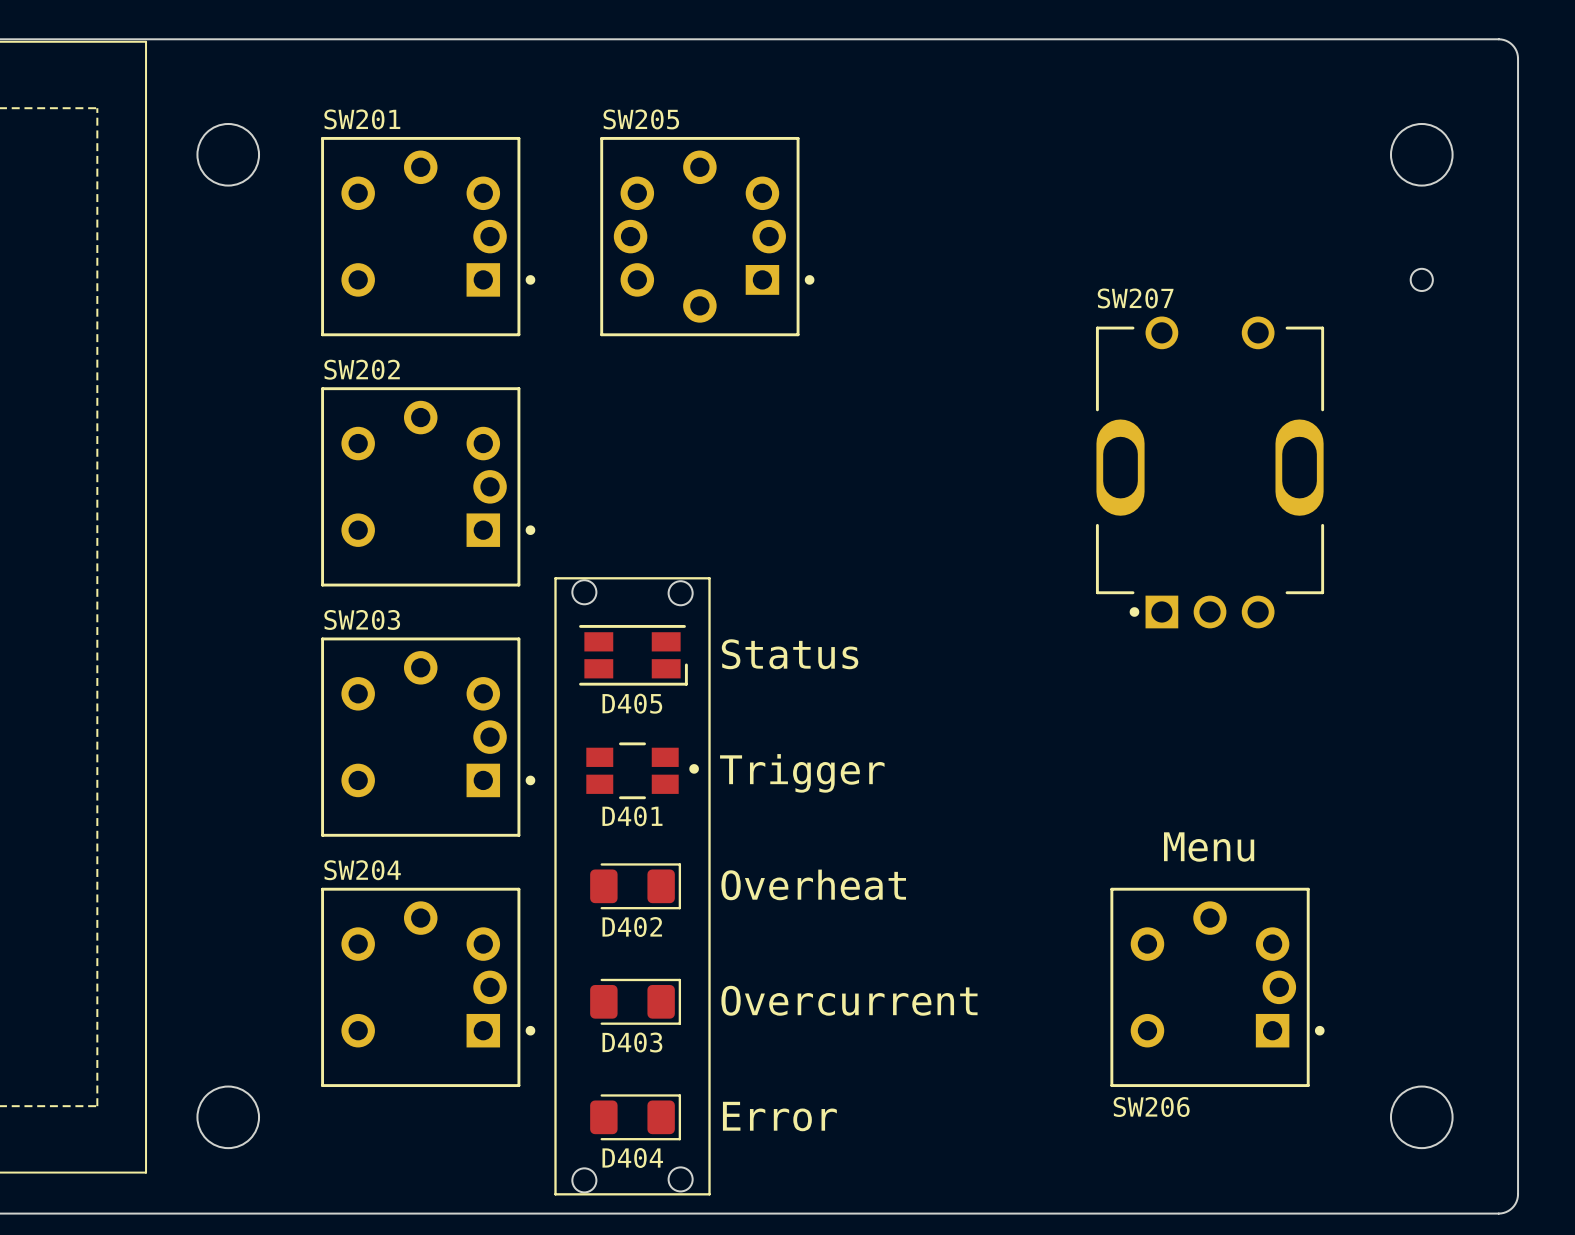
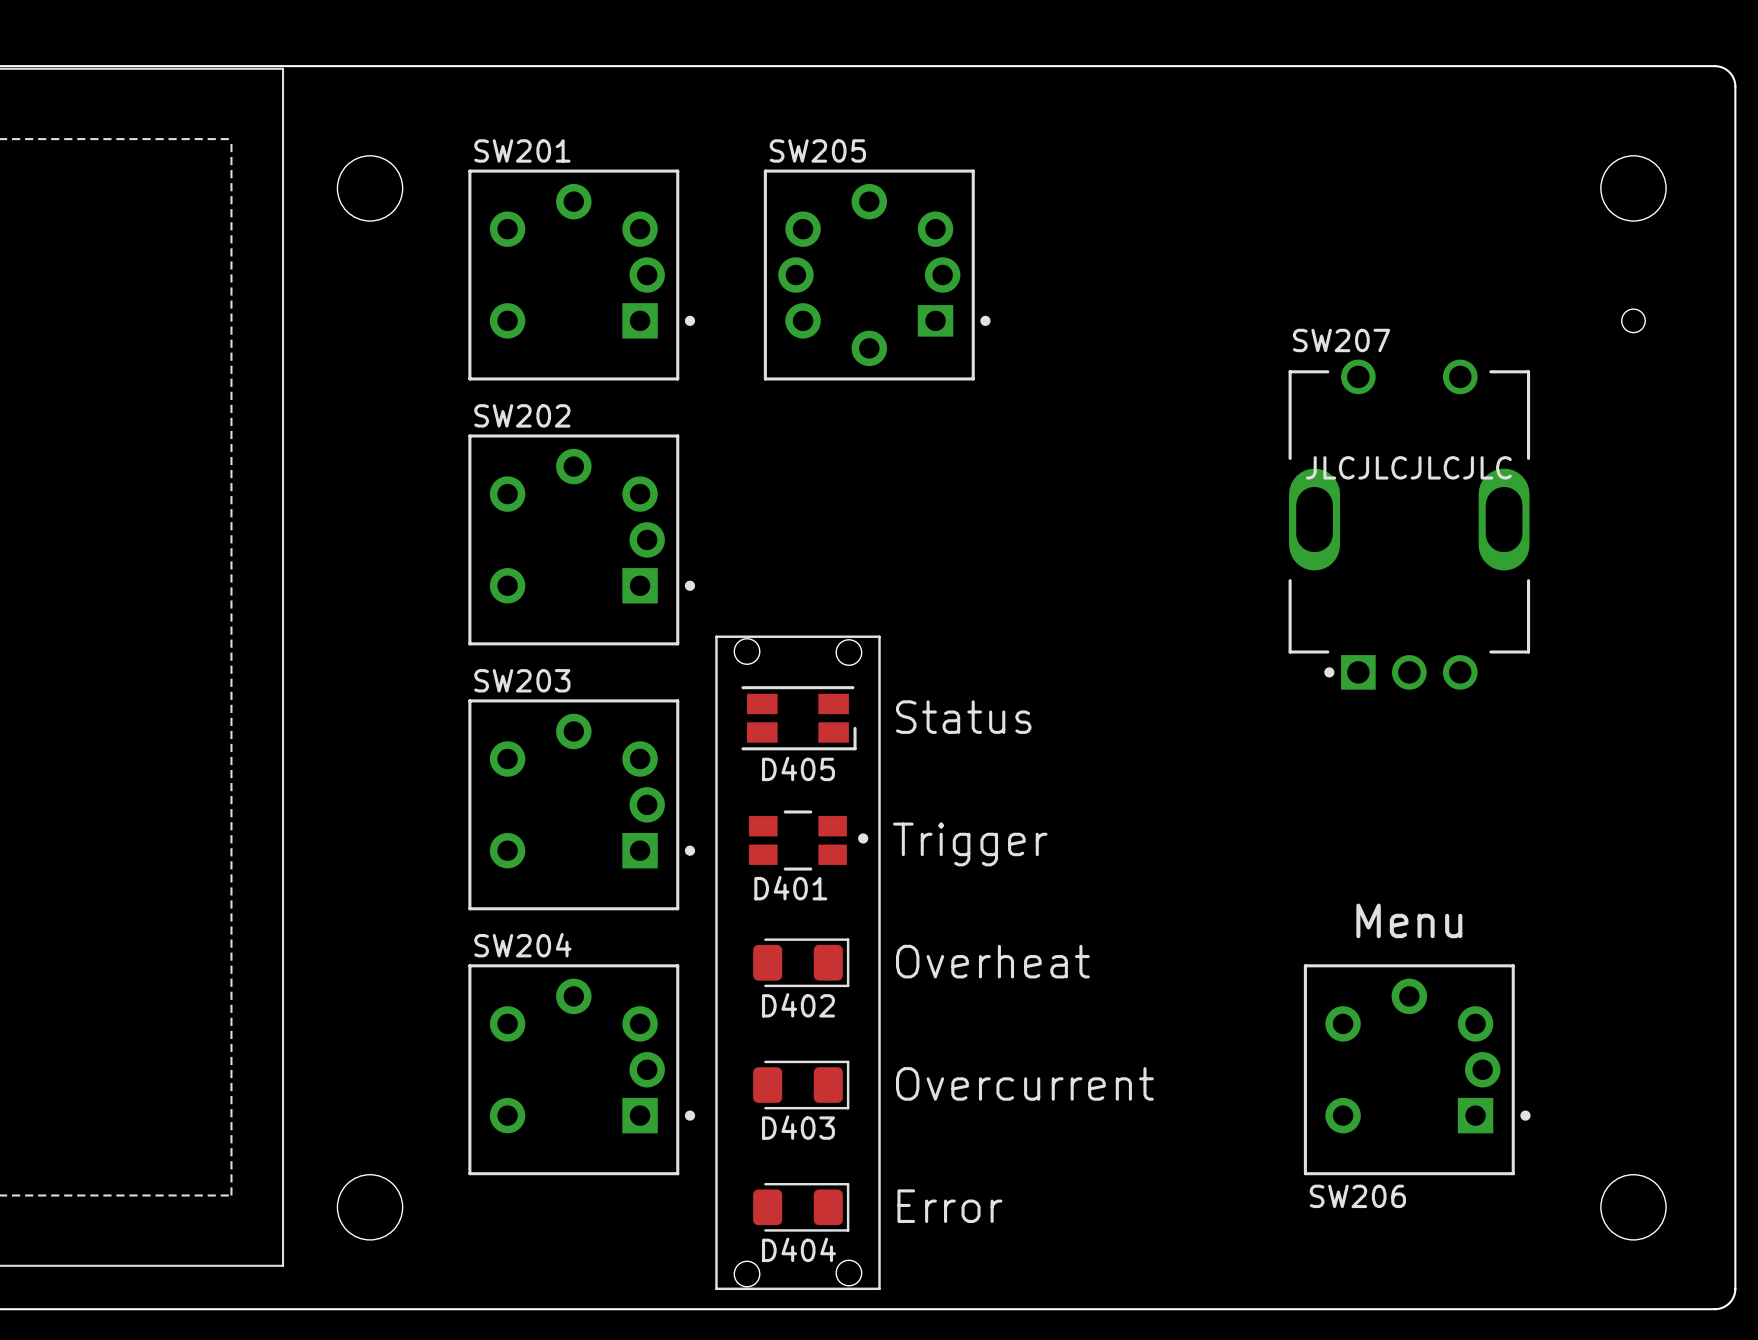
text: none -> JLCJLCJLCJLC (1408, 467)

